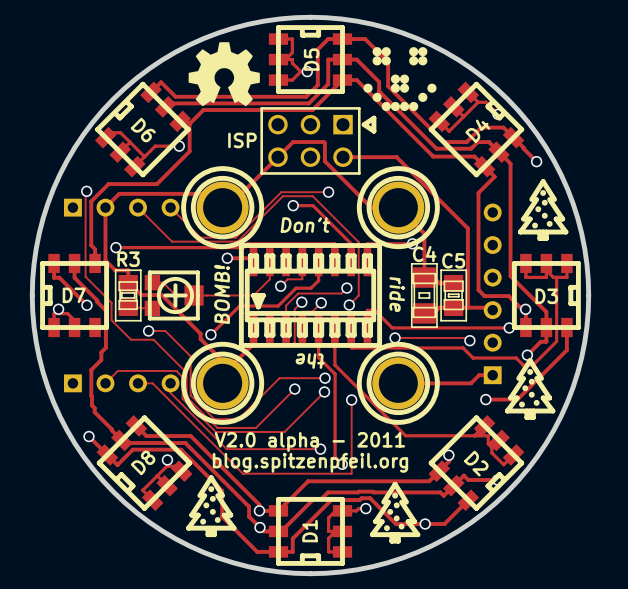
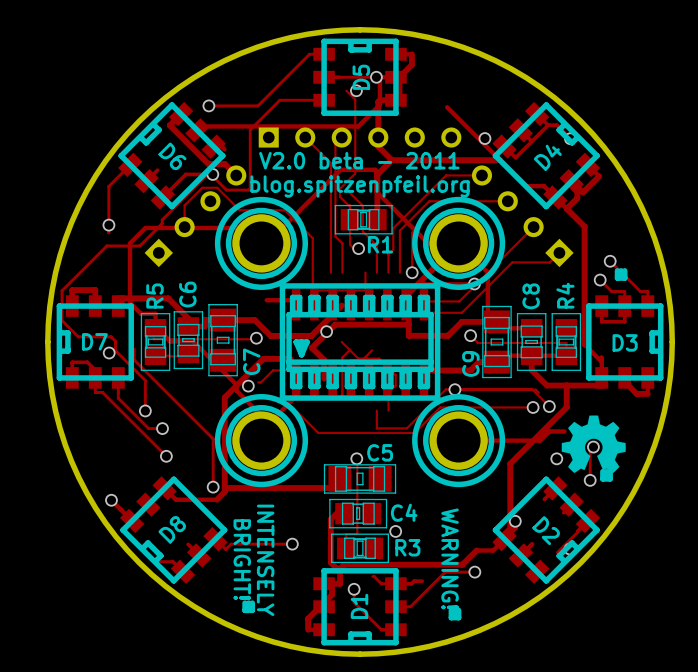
track: (278, 39) (292, 39) (292, 52) (285, 59) -> (324, 54) (309, 54) (257, 105) (208, 105)
track: (342, 39) (328, 39) (317, 49) (317, 85) (306, 96) (175, 96) (161, 82) (151, 92) -> (236, 175) (224, 164) (208, 164) (169, 125) (181, 114)
track: (356, 39) (365, 39) (388, 62) (388, 86) -> (411, 54) (411, 64) (399, 77) (399, 100)
drawing: [188, 42, 260, 107] -> none
drawing: [363, 47, 437, 112] -> none
track: (292, 59) (292, 63) (300, 71) -> (339, 77) (376, 77)
via: none -> (376, 77)
track: (345, 59) (356, 59) (379, 81) (379, 91) (436, 148) (471, 148) (477, 142) (488, 142) (499, 152) -> none
track: none -> (346, 90) (355, 99) (355, 173) (339, 188) (339, 196) (350, 205) (350, 244) (353, 248) (358, 248)
track: (300, 71) (292, 80) (278, 80) -> (145, 410) (145, 380) (115, 350) (115, 341) (111, 336) (78, 336) (62, 320) (62, 290) (106, 245) (139, 245) (162, 223) (162, 220) (208, 173) (226, 190) (249, 190) (250, 129) (279, 100) (324, 100)
track: (342, 80) (312, 110) (203, 110) (189, 123) (189, 151) (156, 184) (108, 184) (91, 201) (91, 245) (95, 249) (95, 256) -> (196, 326) (168, 298) (118, 298)
track: none -> (395, 100) (378, 101) (378, 146) (391, 160)
track: (345, 80) (356, 80) (433, 156) (458, 156) -> none
via: none -> (208, 105)
track: none -> (305, 137) (330, 163) (330, 272)
track: none -> (341, 137) (335, 143) (335, 236) (342, 243) (342, 272)
via: none -> (484, 138)
line: (373, 118) (373, 131) (364, 124) (373, 118) -> none
text: none -> V2.0 beta - 2011 (359, 160)
track: none -> (391, 160) (500, 160)
track: none -> (391, 160) (377, 174) (377, 219)
track: (105, 137) (110, 132) (120, 132) (144, 156) -> (130, 164) (108, 186) (108, 232)
track: (513, 137) (503, 127) (481, 127) (466, 142) (443, 142) -> none
part: ISP (310, 140) -> none
track: none -> (481, 175) (446, 175) (393, 228) (393, 250) (388, 254) (388, 272)
track: (523, 147) (536, 161) -> none
track: (343, 157) (396, 157) (467, 228) (467, 307) -> none
track: (504, 157) (510, 163) (510, 276) (546, 311) (546, 327) -> none
via: (536, 161) -> none
track: none -> (349, 192) (362, 205) (362, 231) (376, 245) (376, 272)
track: none -> (507, 201) (429, 201) (399, 230) (399, 272)
track: (494, 176) (478, 192) (478, 289) (484, 296) (508, 296) (510, 297) -> (599, 176) (583, 192) (577, 186) (577, 198) (566, 208) (584, 226) (584, 344)
part: none -> (195, 216)
part: none -> (522, 216)
R1: none -> (363, 219)
drawing: [532, 190, 553, 229] -> none
track: (86, 191) (85, 276) (111, 302) (111, 320) (131, 339) (153, 339) (186, 372) (186, 397) (217, 427) (255, 427) (294, 389) -> none
track: (328, 192) (281, 192) (235, 237) (200, 237) (170, 207) -> none
via: (328, 192) -> none
track: none -> (184, 227) (184, 205) (202, 187) (217, 187) (239, 210) (284, 210) (312, 238) (313, 290) (365, 290) (365, 272)
track: none -> (533, 227) (459, 301) (428, 301)
track: none -> (413, 231) (412, 232) (412, 272)
line: (531, 199) (543, 181) (554, 199) -> none
line: (536, 199) (523, 219) (530, 219) (520, 232) (565, 232) (556, 219) (562, 219) (549, 199) -> none
track: (293, 205) (313, 205) (351, 243) (351, 262) -> none
via: (293, 205) -> none
part: (121, 207) -> none
track: (138, 207) (172, 241) (237, 241) (282, 196) (312, 196) (358, 242) (358, 295) (349, 305) -> none
track: none -> (458, 243) (408, 293) (408, 335) (447, 335) (461, 321) (487, 321)
via: none -> (358, 248)
track: none -> (559, 252) (549, 262) (512, 262) (461, 312) (428, 312)
via: none -> (610, 261)
text: Don't (305, 225) -> none
via: none -> (412, 272)
track: none -> (600, 280) (611, 291) (624, 291) (624, 306)
via: none -> (600, 280)
track: (115, 247) (243, 247) (247, 243) (334, 243) (334, 262) -> none
via: (115, 247) -> none
C4 name position: C4 (424, 254) -> C4 (404, 512)
via position: (227, 258) -> (256, 338)
R3 name: R3 (128, 259) -> R5 (155, 296)
track: (269, 262) (269, 279) (253, 295) (175, 295) (163, 282) (152, 282) -> none
track: none -> (341, 305) (311, 335) (270, 335) (254, 320) (204, 320) (204, 326) (188, 326)
track: (302, 262) (302, 279) (287, 279) (280, 286) -> none
track: (318, 262) (318, 280) (311, 288) (296, 288) (278, 306) (239, 306) (210, 334) -> none
track: (54, 263) (54, 277) (59, 277) (86, 305) -> (72, 306) (72, 290) (95, 290) (95, 306)
track: (74, 263) (74, 277) (105, 310) (105, 347) (101, 352) (101, 359) (91, 369) (92, 405) (94, 412) (124, 443) (185, 443) (249, 506) (249, 516) (263, 531) (274, 531) -> none
C4 footprint: [411, 263, 438, 328] -> [329, 499, 387, 529]
track: (566, 263) (566, 277) (553, 277) (546, 270) -> (647, 306) (647, 291) (640, 291) (610, 261)
C5 footprint: [440, 269, 467, 322] -> [324, 464, 396, 494]
track: (556, 277) (556, 341) (532, 365) (523, 365) (516, 358) (473, 358) (463, 348) (351, 348) (351, 328) -> none
track: none -> (408, 324) (335, 324) (311, 347) (324, 360) (324, 378)
track: none -> (153, 326) (153, 339) (256, 338)
track: (346, 288) (341, 293) (298, 293) (286, 305) (286, 328) -> none
via: (346, 288) -> none
track: none -> (470, 335) (477, 342) (566, 342) (566, 355)
via: none -> (470, 335)
C6: none -> (188, 340)
C7: none -> (223, 340)
part rotation: 0° (492, 293) -> 90° clockwise (360, 137)
part position: (492, 293) -> (360, 137)
text: BOMB! (222, 294) -> none
text: ride (397, 294) -> none
part: (174, 295) -> none
track: none -> (341, 342) (358, 358) (379, 358) (395, 375) (395, 385) (388, 392) (388, 410)
C9: none -> (496, 342)
C8: none -> (531, 342)
R4: none -> (566, 342)
track: none -> (134, 348) (134, 359) (213, 438) (213, 487)
via: (301, 302) -> none
via: (321, 302) -> none
via: (349, 305) -> none
track: none -> (531, 355) (531, 370) (546, 385) (601, 385) (601, 377)
via: (58, 309) -> none
via: (525, 309) -> none
track: none -> (290, 358) (263, 358) (224, 397) (224, 491) (217, 499)
track: none -> (487, 362) (478, 362) (470, 370) (428, 370)
track: none -> (290, 370) (273, 370) (261, 382) (258, 382)
track: none -> (95, 377) (95, 392) (102, 392) (166, 456)
track: none -> (118, 377) (118, 398) (148, 428) (162, 428)
track: (509, 327) (392, 327) (374, 310) (367, 310) (367, 328) -> none
via: (509, 327) -> none
track: (318, 328) (318, 357) (335, 374) (335, 457) (342, 464) -> none
track: (334, 328) (334, 365) (405, 435) (488, 435) (488, 443) (491, 447) (491, 452) (504, 464) -> (557, 552) (577, 531)
track: (148, 331) (165, 331) (190, 356) (190, 395) (214, 419) (238, 419) (279, 378) (325, 378) -> none
via: (148, 331) -> none
track: (546, 331) (546, 341) (540, 341) (527, 355) -> (624, 381) (636, 393) (647, 393)
track: none -> (566, 385) (566, 407) (510, 463) (510, 533)
via: (469, 340) -> none
track: (566, 341) (566, 350) (517, 399) (485, 399) -> none
track: none -> (549, 406) (532, 389) (445, 389) (406, 428) (376, 428) (376, 410)
via: none -> (549, 406)
track: none -> (533, 407) (440, 407) (414, 432) (318, 432) (297, 412)
via: none -> (533, 407)
via: (527, 355) -> none
via: none -> (145, 410)
text: the (310, 361) -> none
drawing: [519, 369, 540, 408] -> none
via: none -> (162, 428)
via: (325, 378) -> none
line: (518, 378) (530, 360) (541, 378) -> none
line: (523, 378) (510, 397) (517, 397) (507, 411) (552, 411) (543, 397) (549, 397) (536, 378) -> none
track: (105, 383) (117, 370) (176, 370) (182, 377) (182, 398) (215, 431) (284, 431) (324, 392) -> none
part: (121, 383) -> none
track: (138, 383) (152, 383) (243, 473) (351, 473) (351, 400) -> none
track: (170, 383) (170, 392) (226, 449) (320, 449) -> none
drawing shape: [522, 385, 529, 392] -> [561, 415, 626, 474]
via: (294, 389) -> none
track: none -> (593, 447) (590, 450) (590, 480)
via: none -> (593, 447)
via: (324, 392) -> none
via: none -> (166, 456)
track: none -> (356, 458) (357, 533) (346, 534) (346, 548)
via: none -> (356, 458)
via: (351, 400) -> none
via: none -> (590, 480)
via: none -> (213, 487)
track: none -> (224, 487) (339, 487)
track: (183, 436) (190, 436) (259, 504) (259, 510) (278, 510) (308, 481) (414, 481) -> (340, 568) (344, 564) (462, 564) (476, 550)
track: none -> (344, 505) (330, 519) (330, 562) (336, 568) (340, 568)
text: V2.0 alpha - 2011 (309, 441) -> none
via: (320, 449) -> none
track: (107, 454) (117, 465) (132, 449) (181, 449) (222, 490) (222, 516) (257, 551) (264, 551) -> (332, 583) (332, 594) (308, 618) (308, 629)
via: (167, 459) -> none
text position: blog.spitzenpfeil.org (310, 462) -> blog.spitzenpfeil.org (360, 186)
track: (181, 471) (176, 466) (166, 466) (143, 491) -> (158, 561) (172, 561)
track: none -> (215, 539) (225, 549) (231, 544) (292, 544)
via: none -> (292, 544)
track: (463, 475) (468, 479) (497, 479) -> none
R3: none -> (360, 548)
track: (453, 485) (443, 495) (440, 492) (327, 492) (321, 499) (313, 499) (281, 531) (278, 531) -> none
drawing: [200, 486, 221, 525] -> none
text: none -> WARNING! (450, 558)
text: none -> BRIGHT! (242, 559)
text: none -> INTENSELY (265, 560)
drawing: [384, 492, 405, 532] -> none
line: (199, 495) (211, 477) (222, 495) -> none
line: (204, 495) (191, 515) (198, 515) (188, 528) (234, 528) (224, 515) (230, 515) (217, 495) -> none
track: none -> (340, 568) (340, 583) (324, 583)
track: none -> (474, 572) (445, 572) (410, 606) (395, 606)
via: none -> (474, 572)
track: (468, 500) (444, 524) (395, 524) (370, 498) (331, 500) (292, 538) (292, 551) (278, 551) -> none
line: (383, 502) (395, 484) (406, 502) -> none
line: (388, 502) (375, 521) (382, 521) (372, 534) (417, 534) (408, 521) (414, 521) (401, 502) -> none
via: (365, 508) -> none
via: (259, 510) -> none
track: (335, 510) (328, 517) (328, 531) (342, 531) -> (388, 583) (381, 583) (372, 576)
via: none -> (354, 589)
via: (425, 524) -> none
via: (259, 527) -> none
track: (335, 531) (328, 538) (329, 551) -> (354, 589) (354, 602) (381, 629)

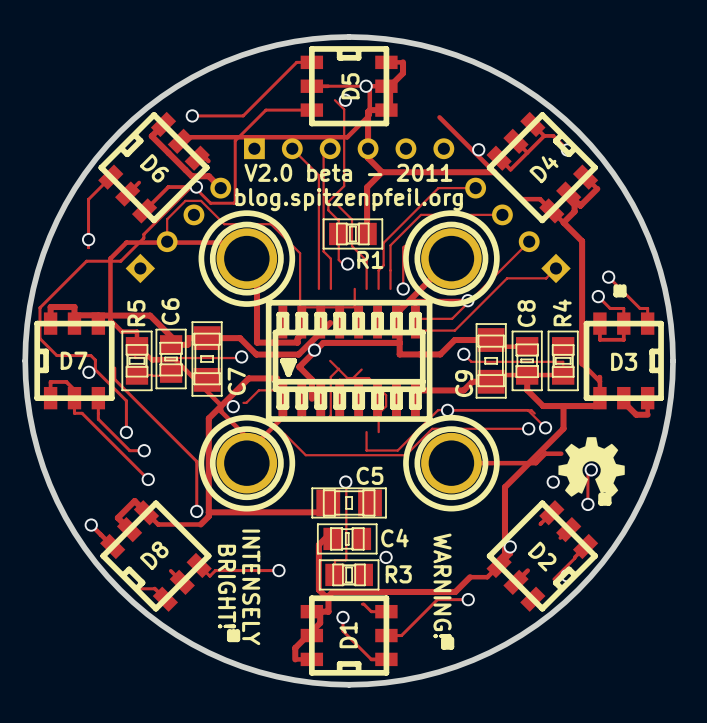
track: (261, 243) (266, 243) (340, 169) (375, 169) (376, 191) (428, 243) (458, 243) (487, 272) (487, 321) -> (246, 258) (257, 268) (257, 342) (297, 342) (297, 338) (301, 334)
track: none -> (74, 315) (98, 315)
track: (266, 300) (291, 300) (296, 304) -> none
track: none -> (146, 512) (134, 501) (117, 517) (129, 529)
track: (422, 581) (414, 581) (411, 583) (395, 583) -> none

